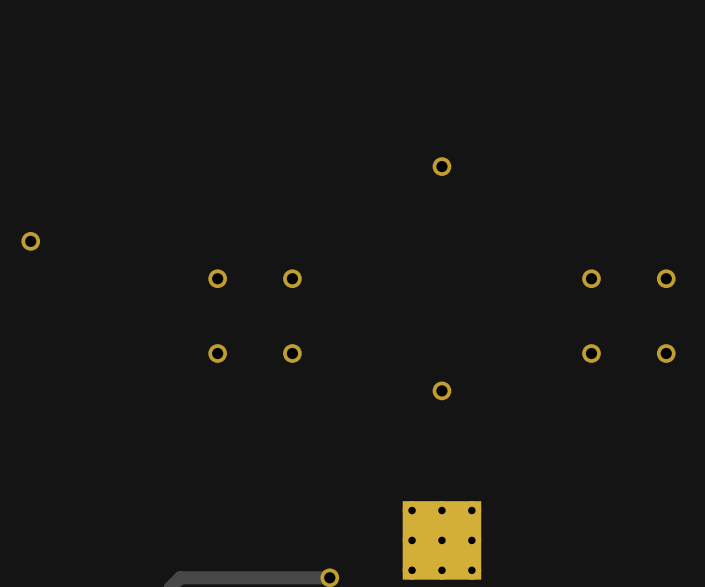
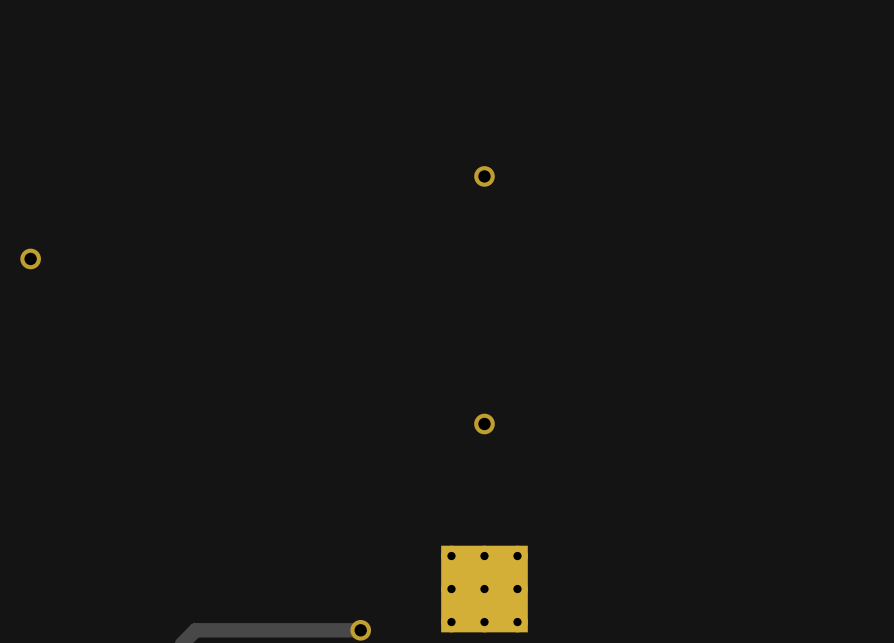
via: (217, 278) -> none
via: (292, 278) -> none
via: (591, 278) -> none
via: (666, 278) -> none
via: (217, 353) -> none
via: (292, 353) -> none
via: (591, 353) -> none
via: (666, 353) -> none

